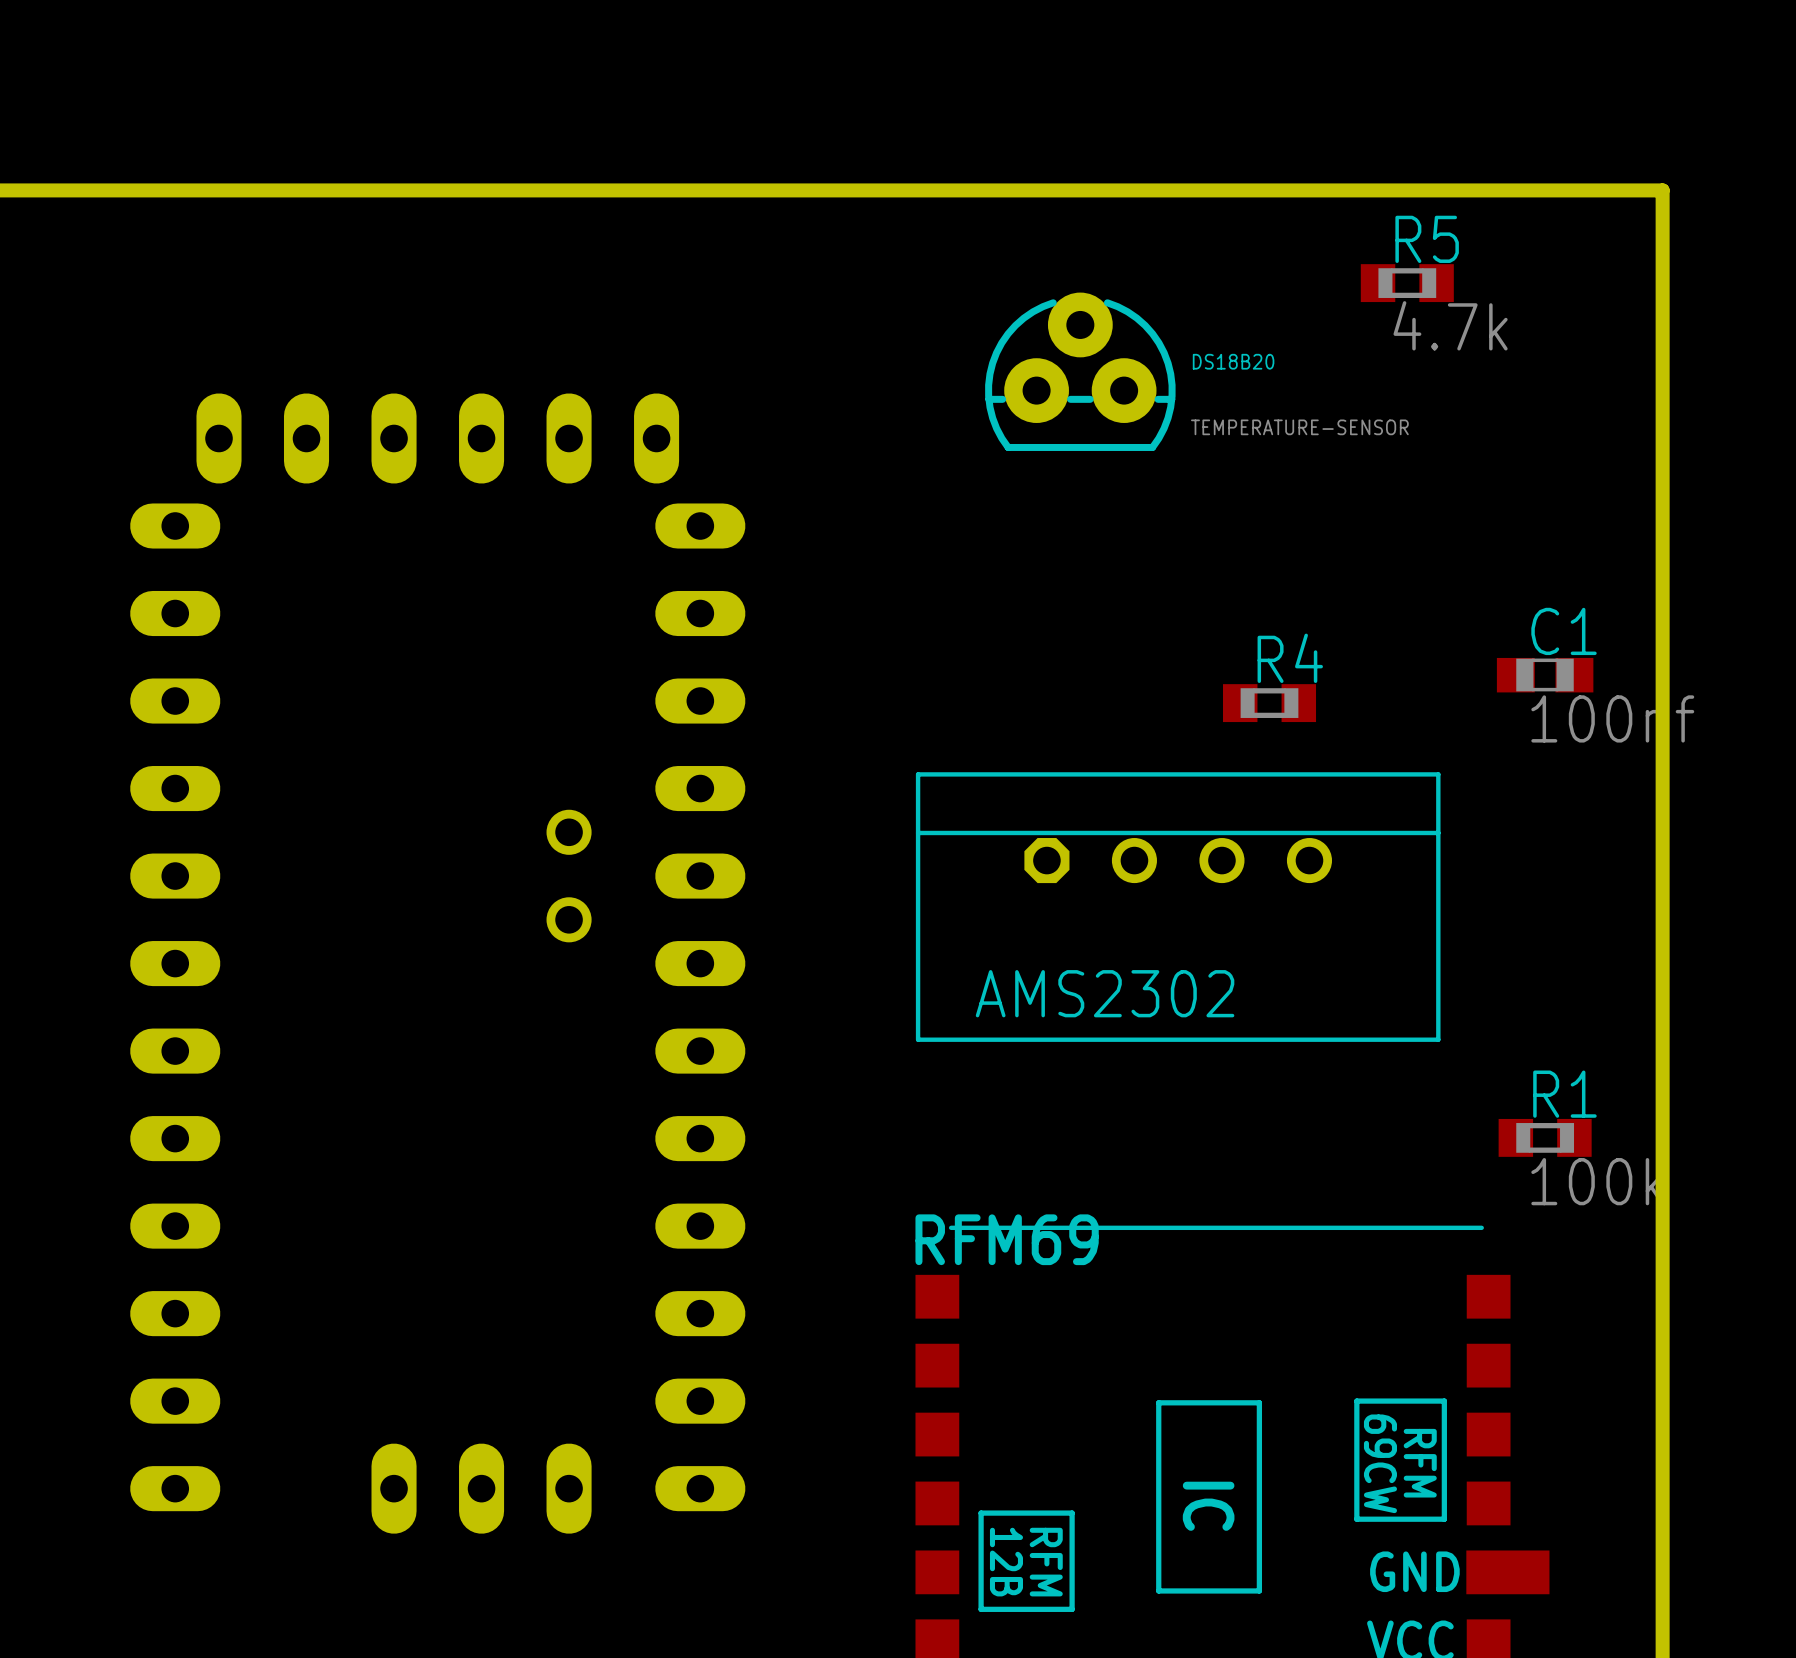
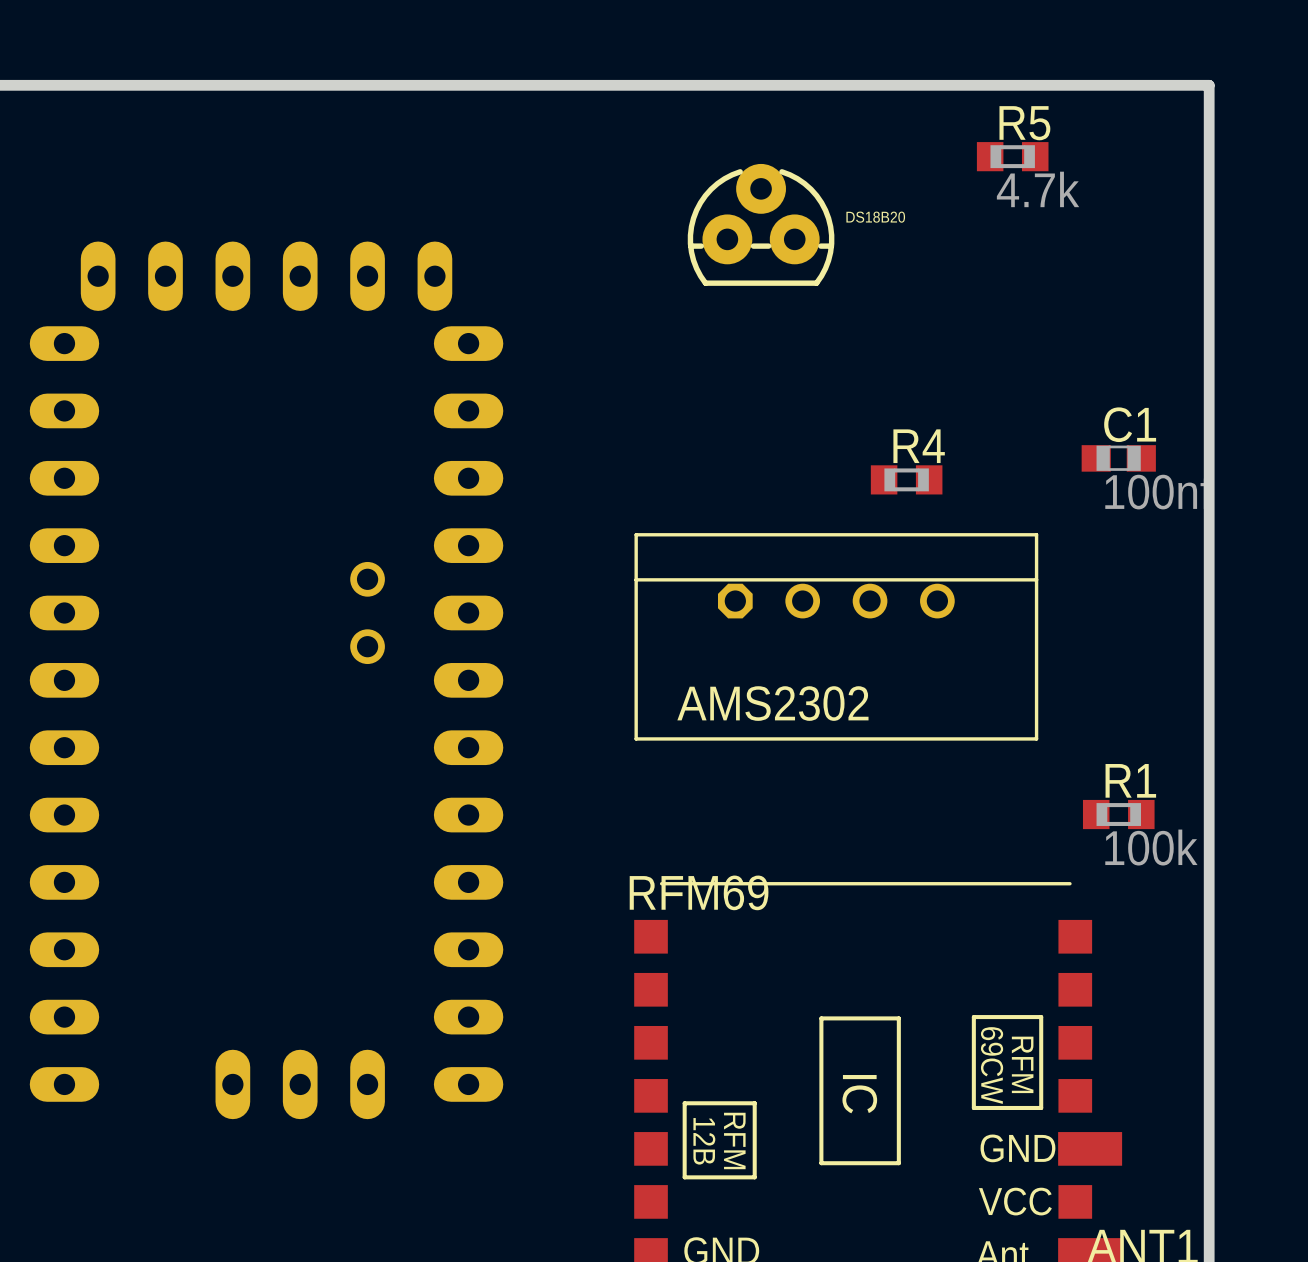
DS18B20 value: TEMPERATURE-SENSOR (1299, 427) -> none

